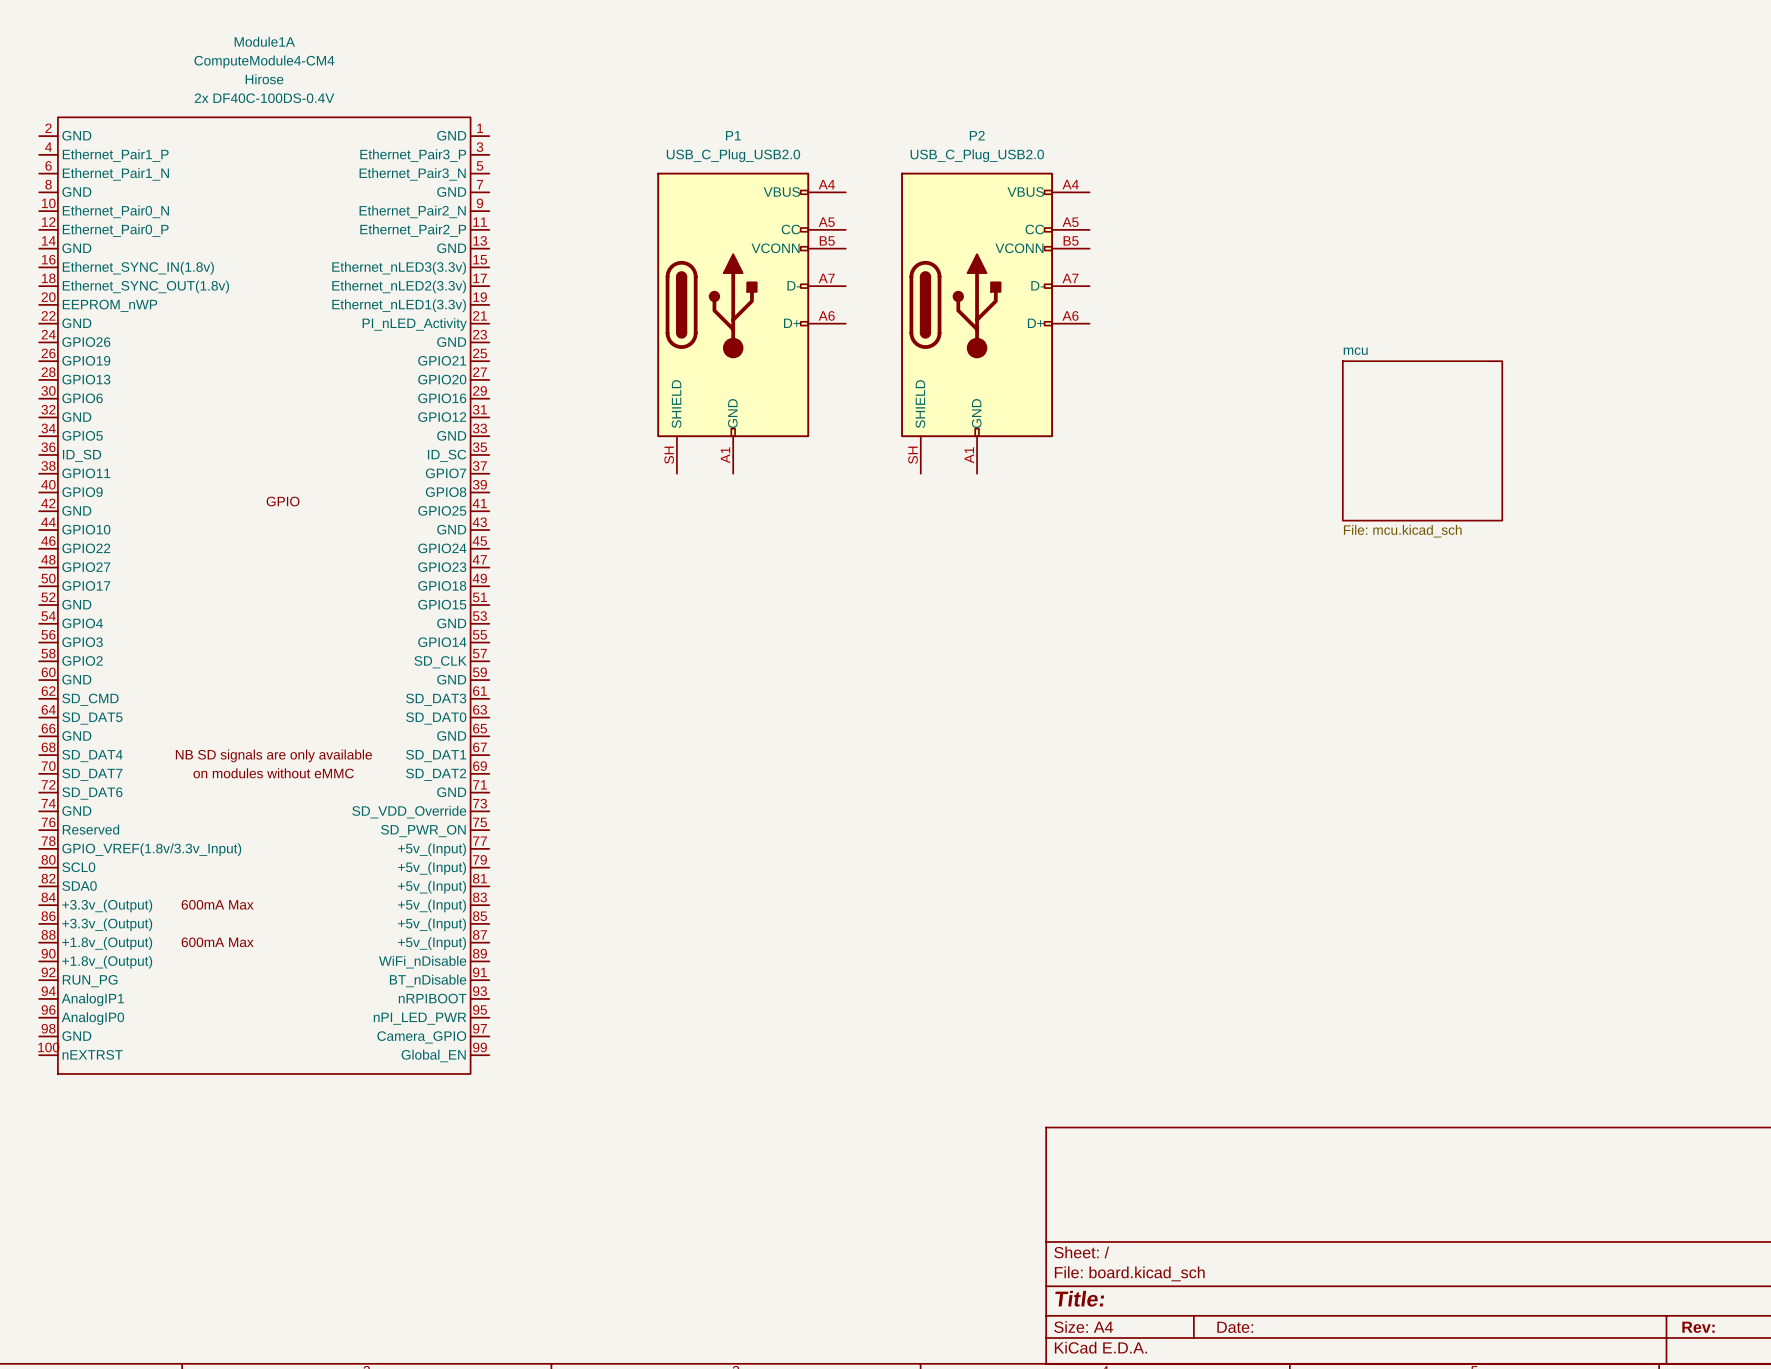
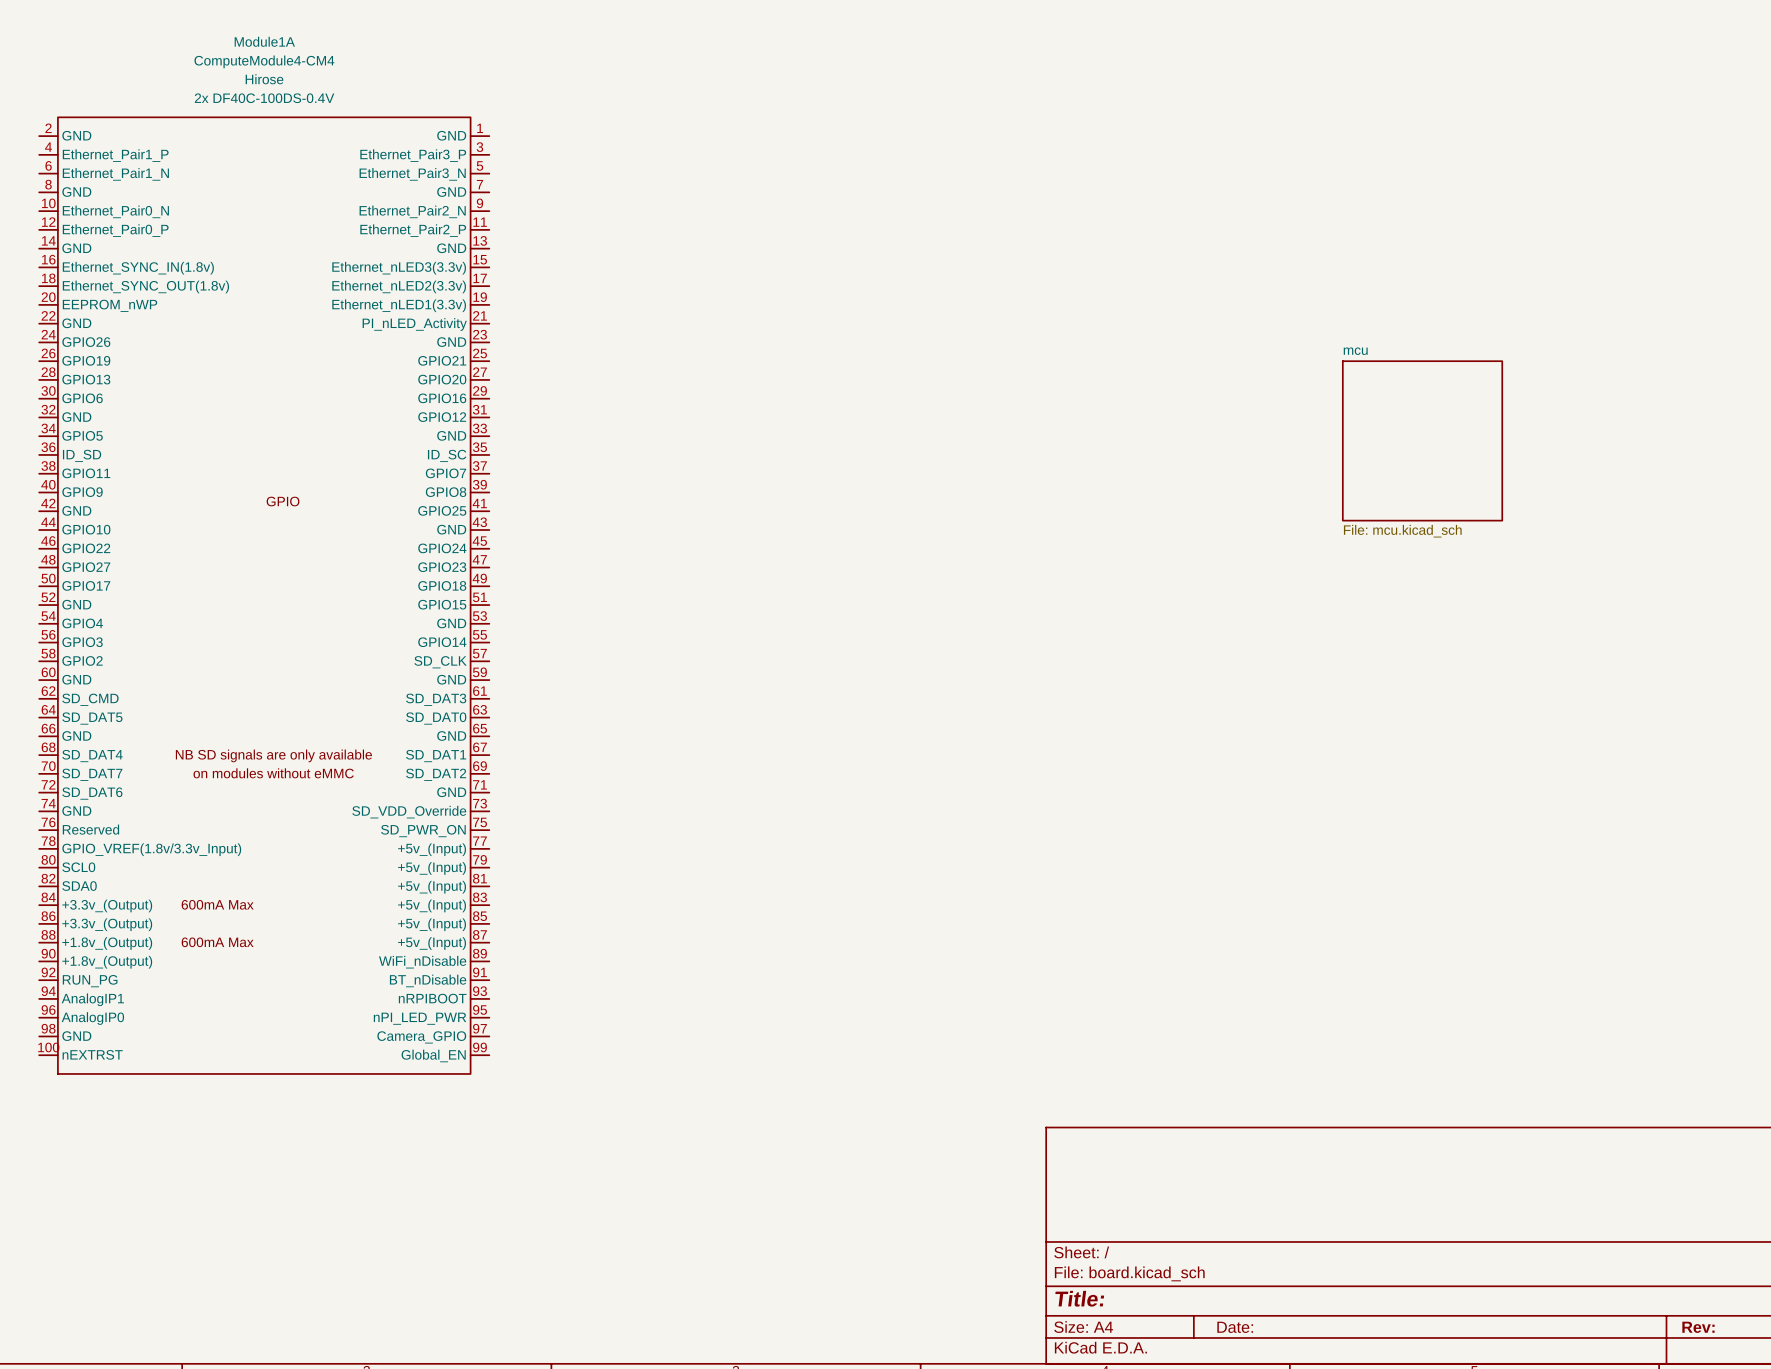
P1: USB_C_Plug_USB2.0 (751, 323) -> none
P2: USB_C_Plug_USB2.0 (995, 323) -> none

